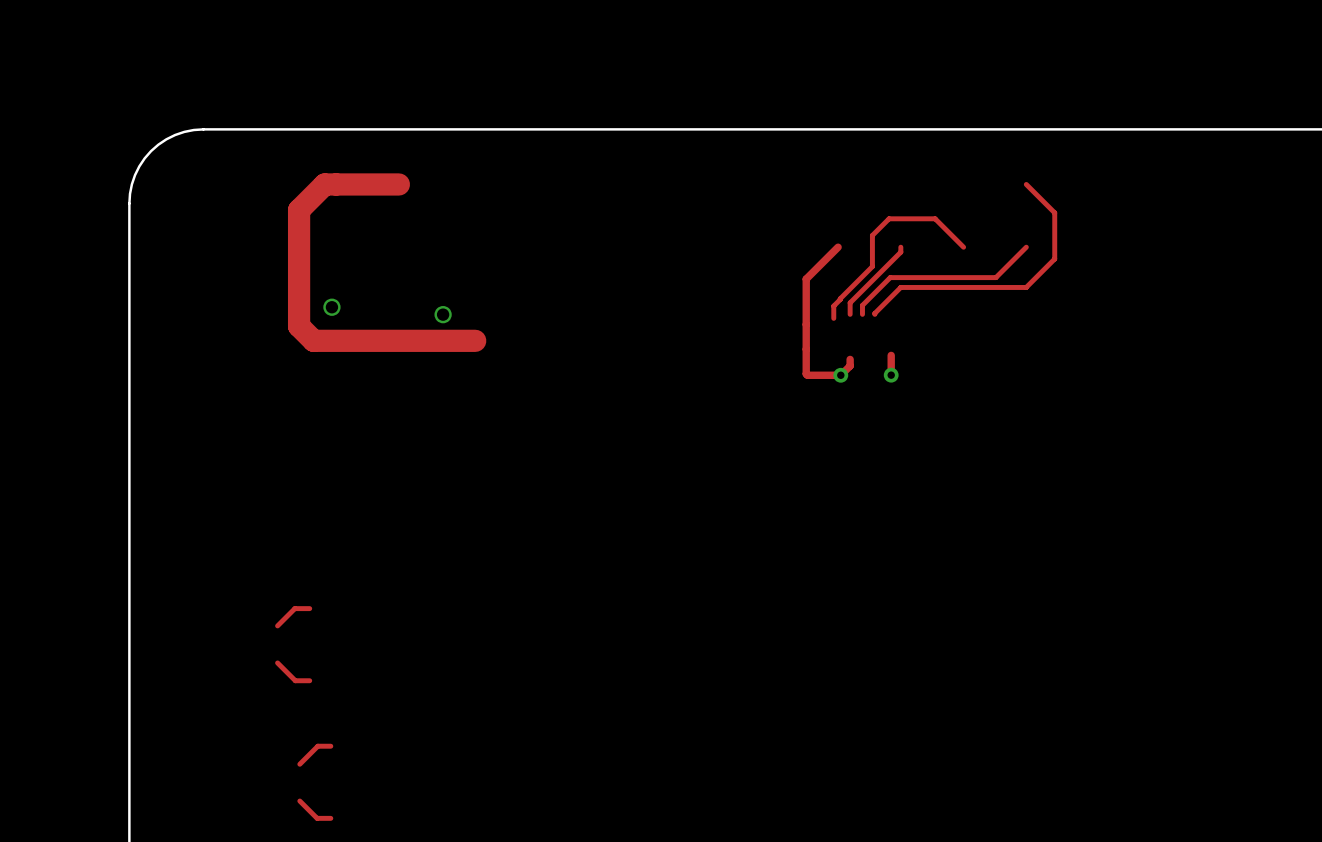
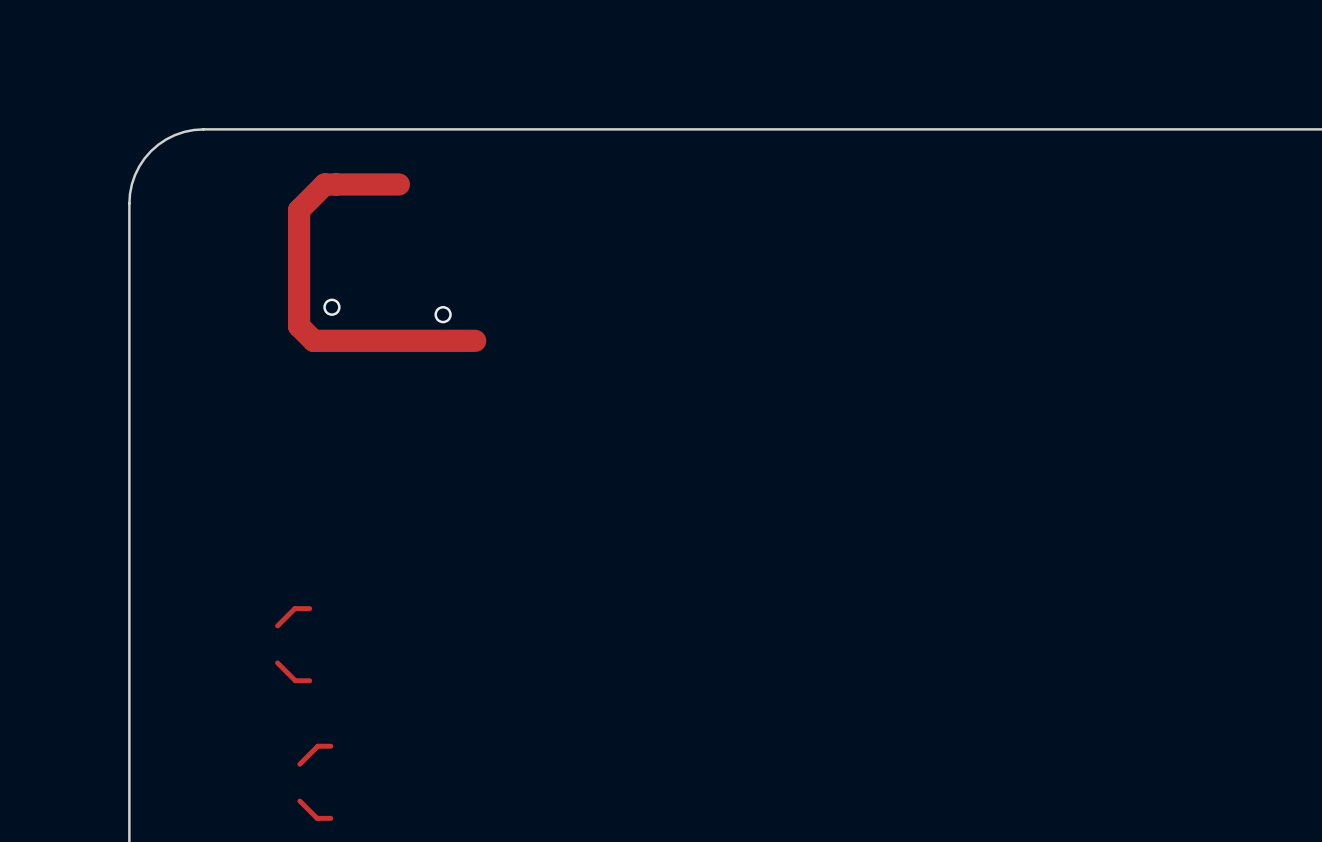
track: (1026, 184) (1054, 212) (1054, 258) (1026, 287) (900, 287) (874, 314) -> none
track: (838, 247) (806, 279) (806, 373) (840, 375) (850, 365) (850, 359) -> none
track: (900, 247) (900, 252) (850, 302) (850, 314) -> none
track: (963, 247) (935, 218) (889, 218) (872, 235) (872, 266) (833, 306) (833, 318) -> none
track: (1026, 247) (995, 277) (890, 277) (862, 305) (862, 314) -> none
track: (891, 355) (891, 375) -> none
via: (840, 375) -> none
via: (891, 375) -> none

